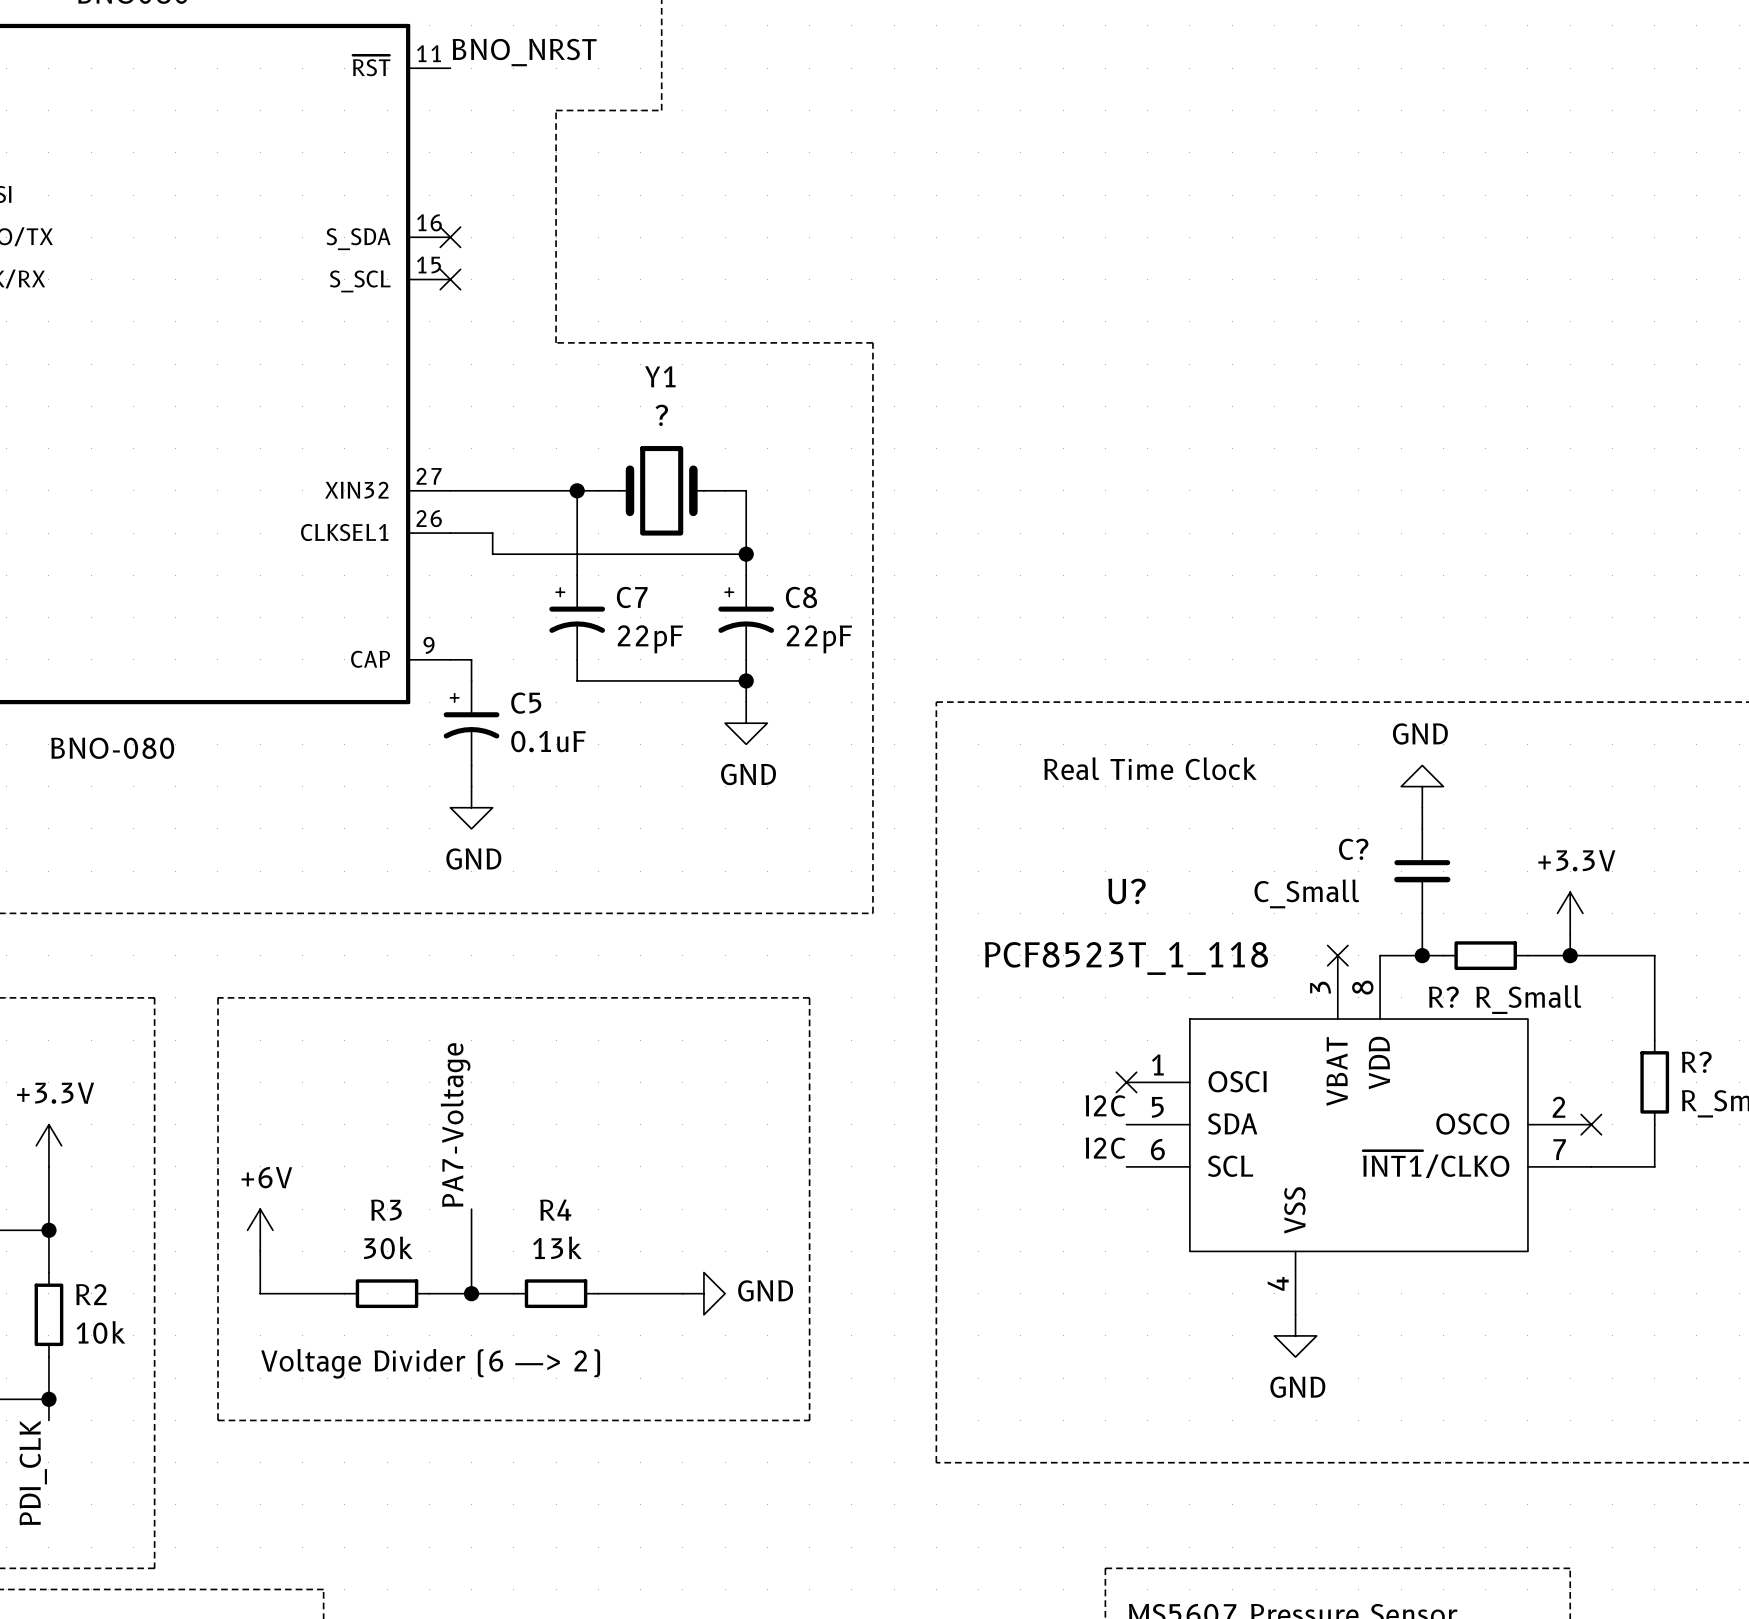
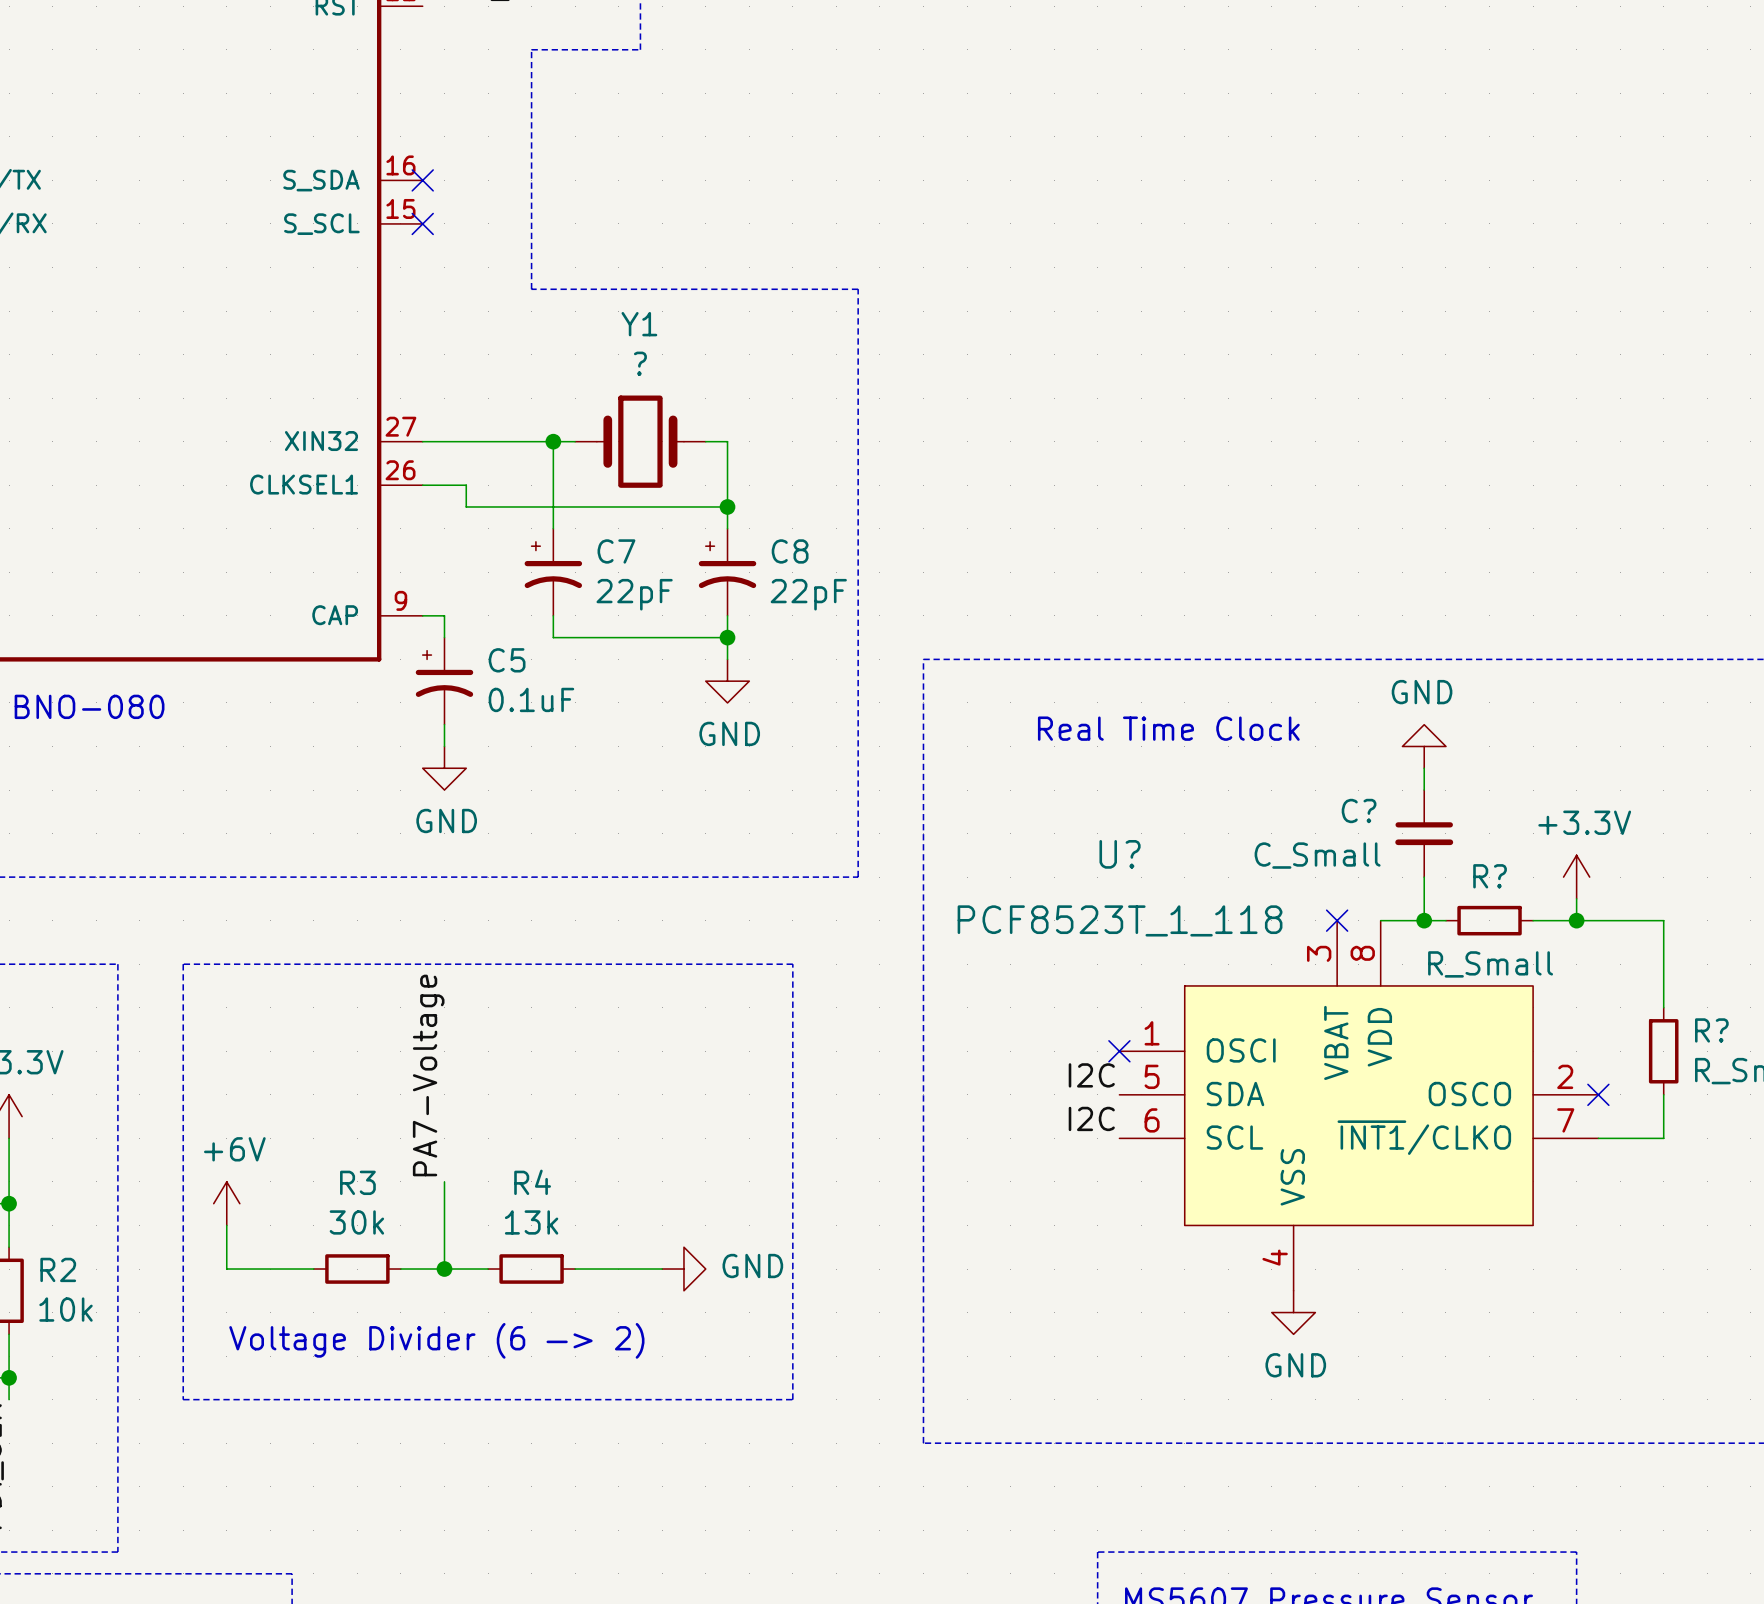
R? name position: R? (1443, 997) -> R? (1490, 876)
R? value position: R_Small (1528, 999) -> R_Small (1490, 964)

